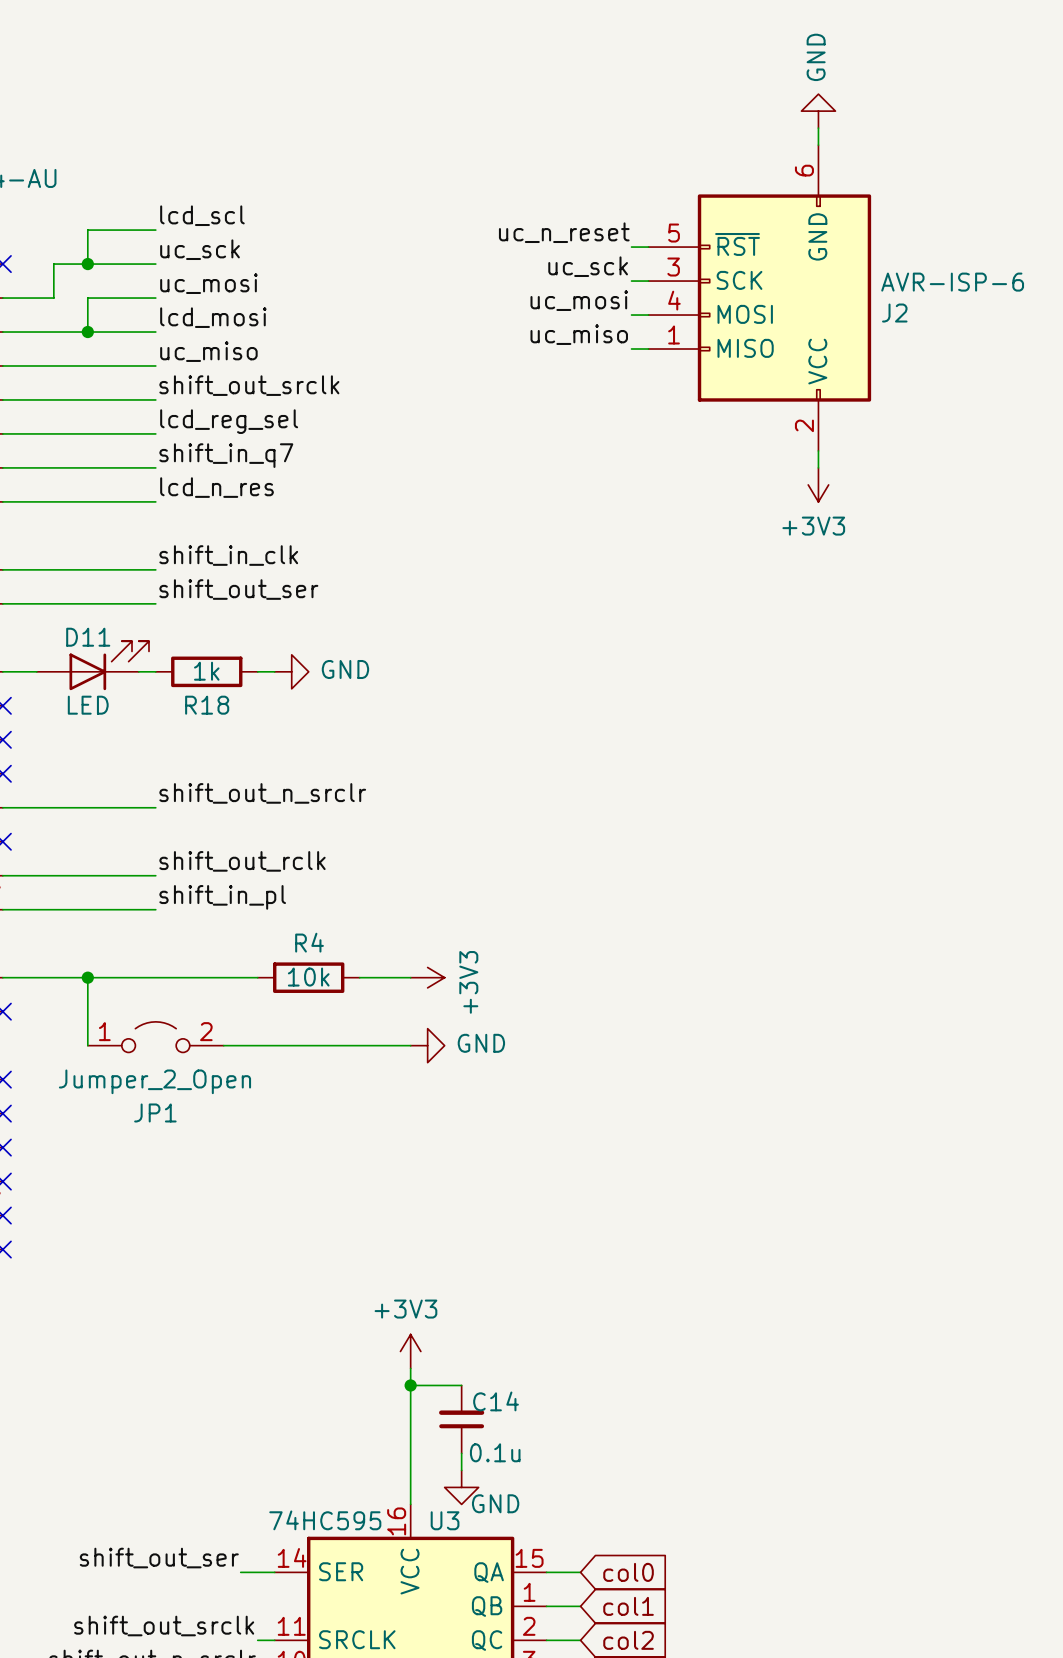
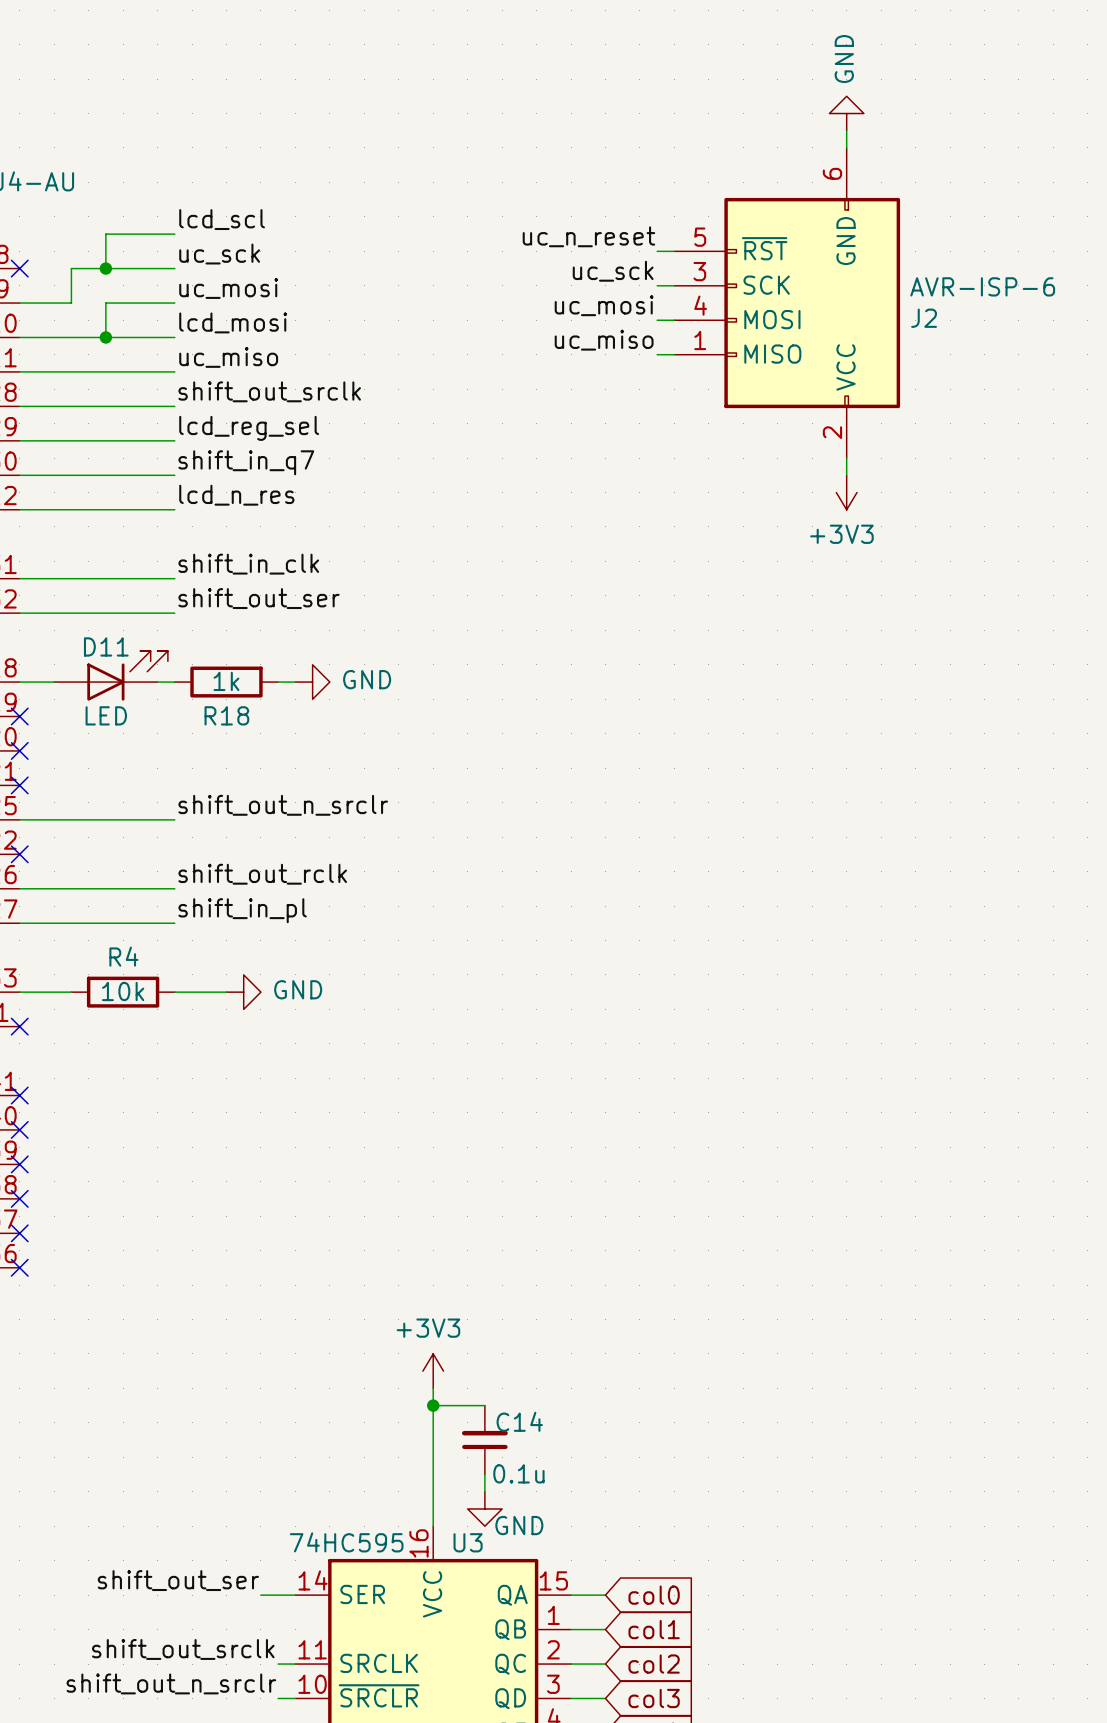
wire: (53, 977) (155, 977) -> none
wire: (87, 977) (87, 1045) -> none
junction: (87, 977) -> none
wire: (206, 977) (257, 977) -> none
R4 position: (308, 977) -> (123, 992)
wire: (359, 977) (410, 977) -> none
power symbol: +3V3 (427, 977) -> none
JP1: Jumper_2_Open (155, 1037) -> none
wire: (223, 1045) (410, 1045) -> none
power symbol position: GND (427, 1045) -> GND (243, 992)

